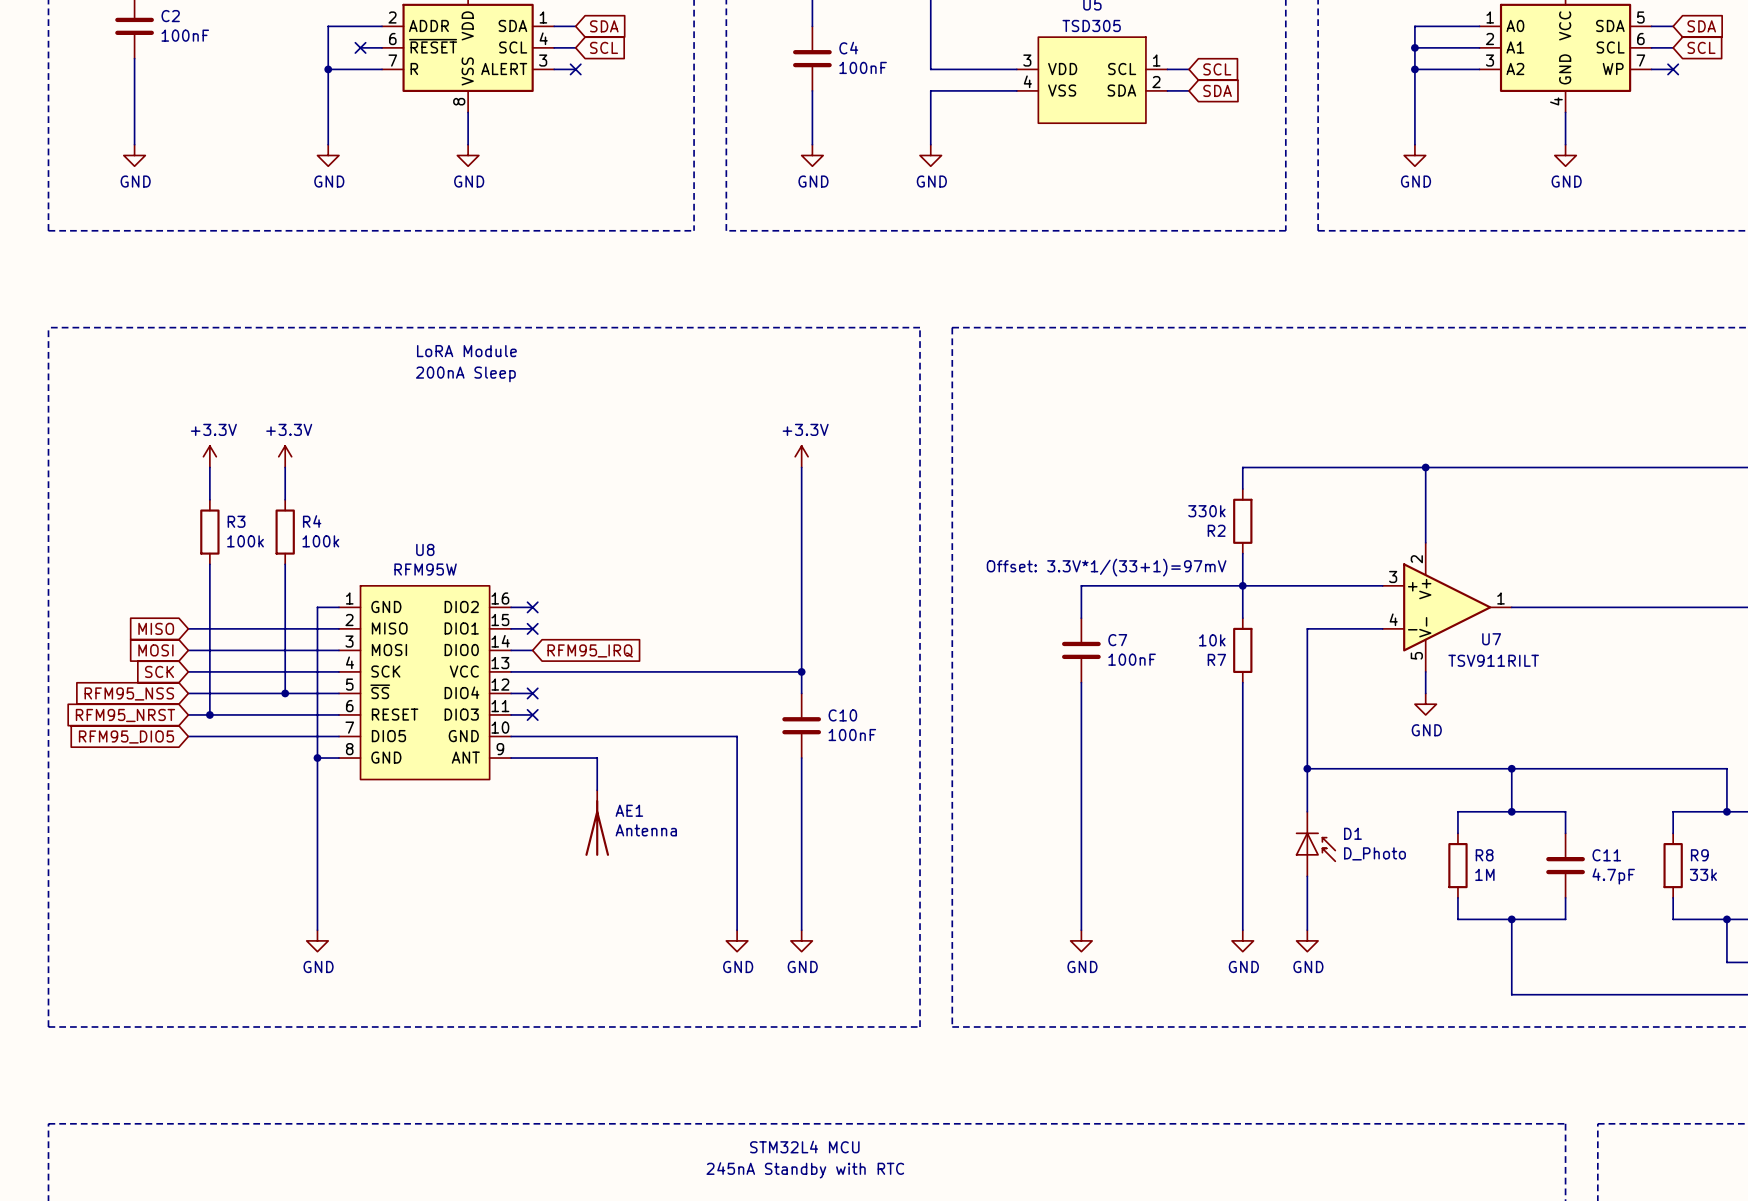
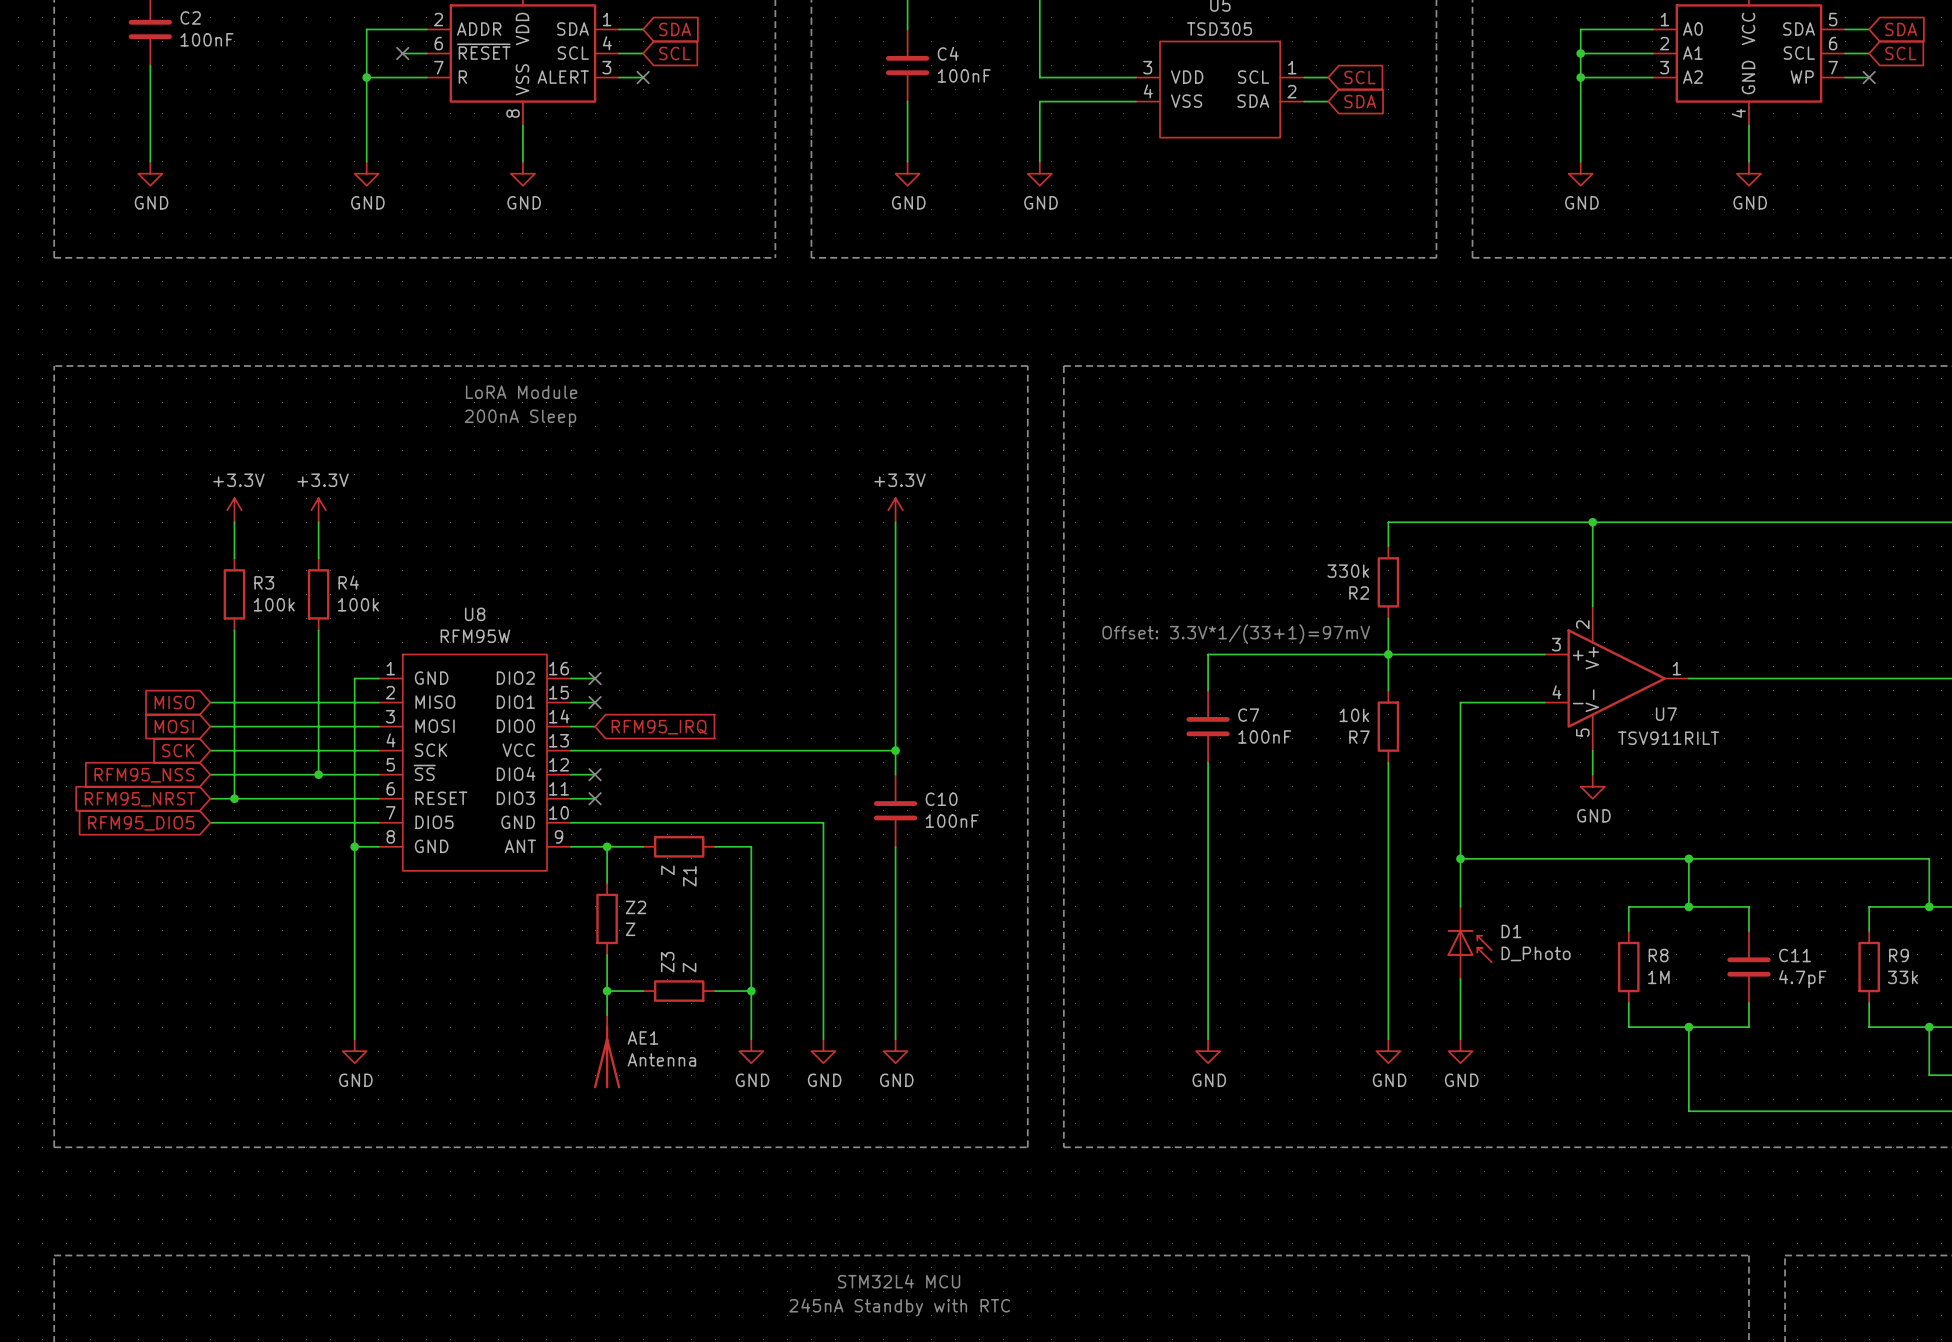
wire: none -> (607, 846) (607, 882)
junction: none -> (607, 846)
wire: (575, 758) (597, 758) (597, 790) -> none
Z1: none -> Z (679, 846)
wire: none -> (715, 846) (751, 846) (751, 1039)
Z2: none -> Z (607, 918)
AE1 position: (597, 823) -> (607, 1051)
wire: none -> (607, 954) (607, 1015)
wire: none -> (607, 991) (643, 991)
junction: none -> (607, 991)
Z3: none -> Z (679, 991)
wire: none -> (715, 991) (751, 991)
junction: none -> (751, 991)
power symbol: none -> GND (751, 1051)

